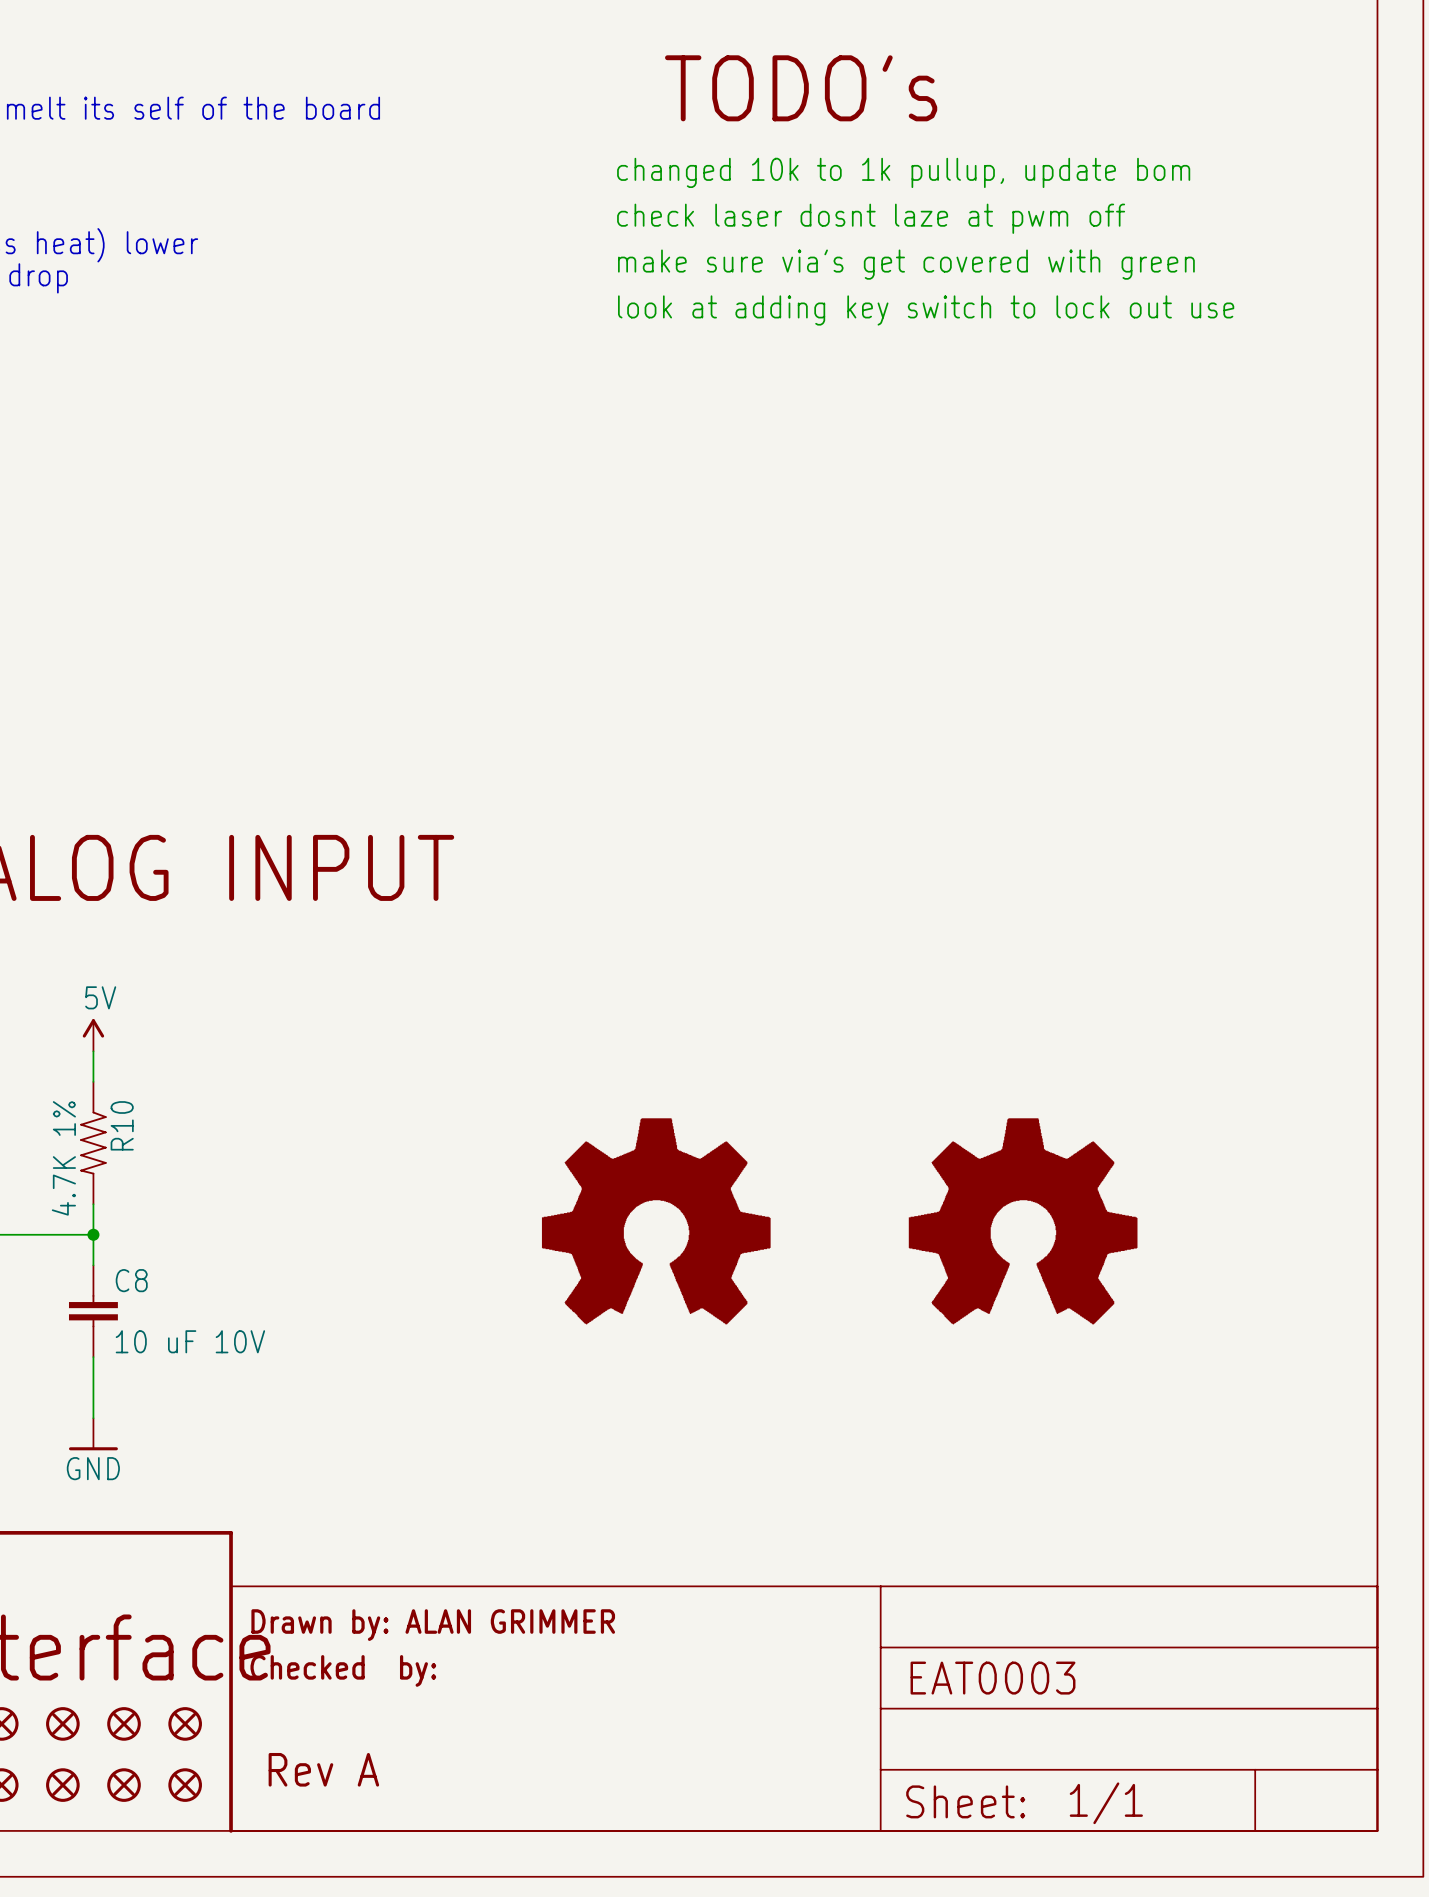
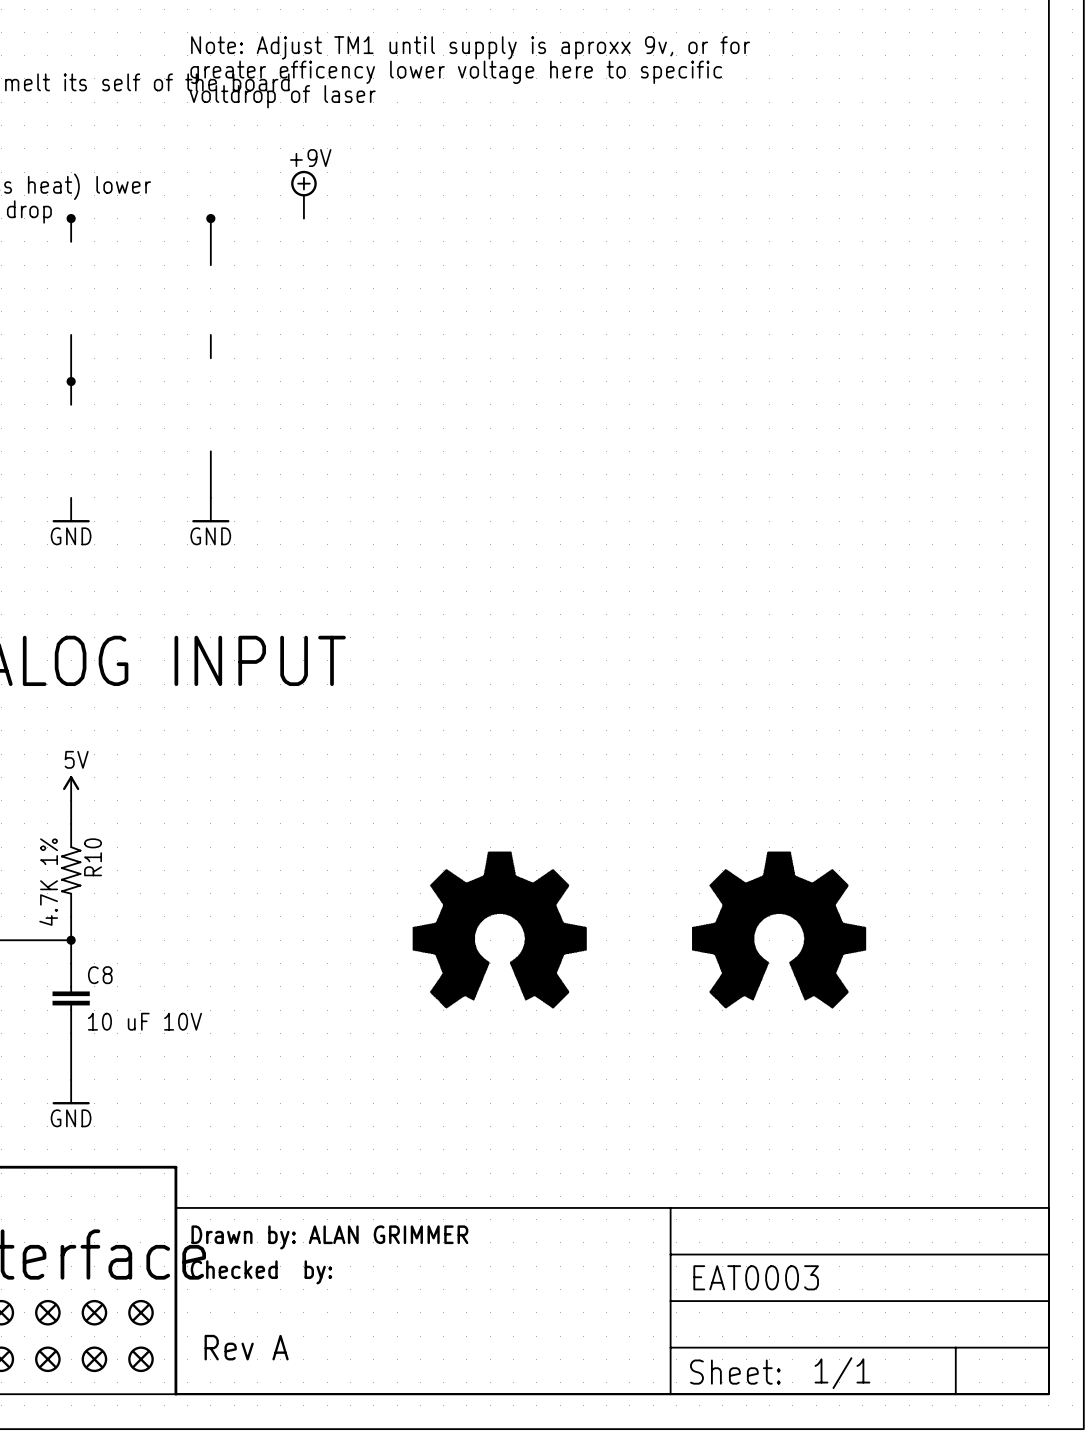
text: none -> Note: Adjust TM1 until supply is aproxx 9v, or for (470, 47)
text: TODO's (801, 88) -> none
text: none -> greater efficency lower voltage here to specific (456, 72)
text: none -> voltdrop of laser (282, 96)
text: changed 10k to 1k pullup, update bom (903, 172) -> none
text: check laser dosnt laze at pwm off (871, 218) -> none
power symbol: none -> +9V (303, 194)
text: make sure via's get covered with green (906, 264) -> none
wire: none -> (71, 218) (71, 241)
junction: none -> (71, 218)
wire: none -> (210, 218) (210, 265)
junction: none -> (210, 218)
text: look at adding key switch to lock out use (926, 310) -> none
wire: none -> (71, 334) (71, 404)
wire: none -> (210, 334) (210, 358)
junction: none -> (71, 381)
wire: none -> (210, 451) (210, 497)
power symbol: none -> GND (71, 510)
power symbol: none -> GND (210, 510)

